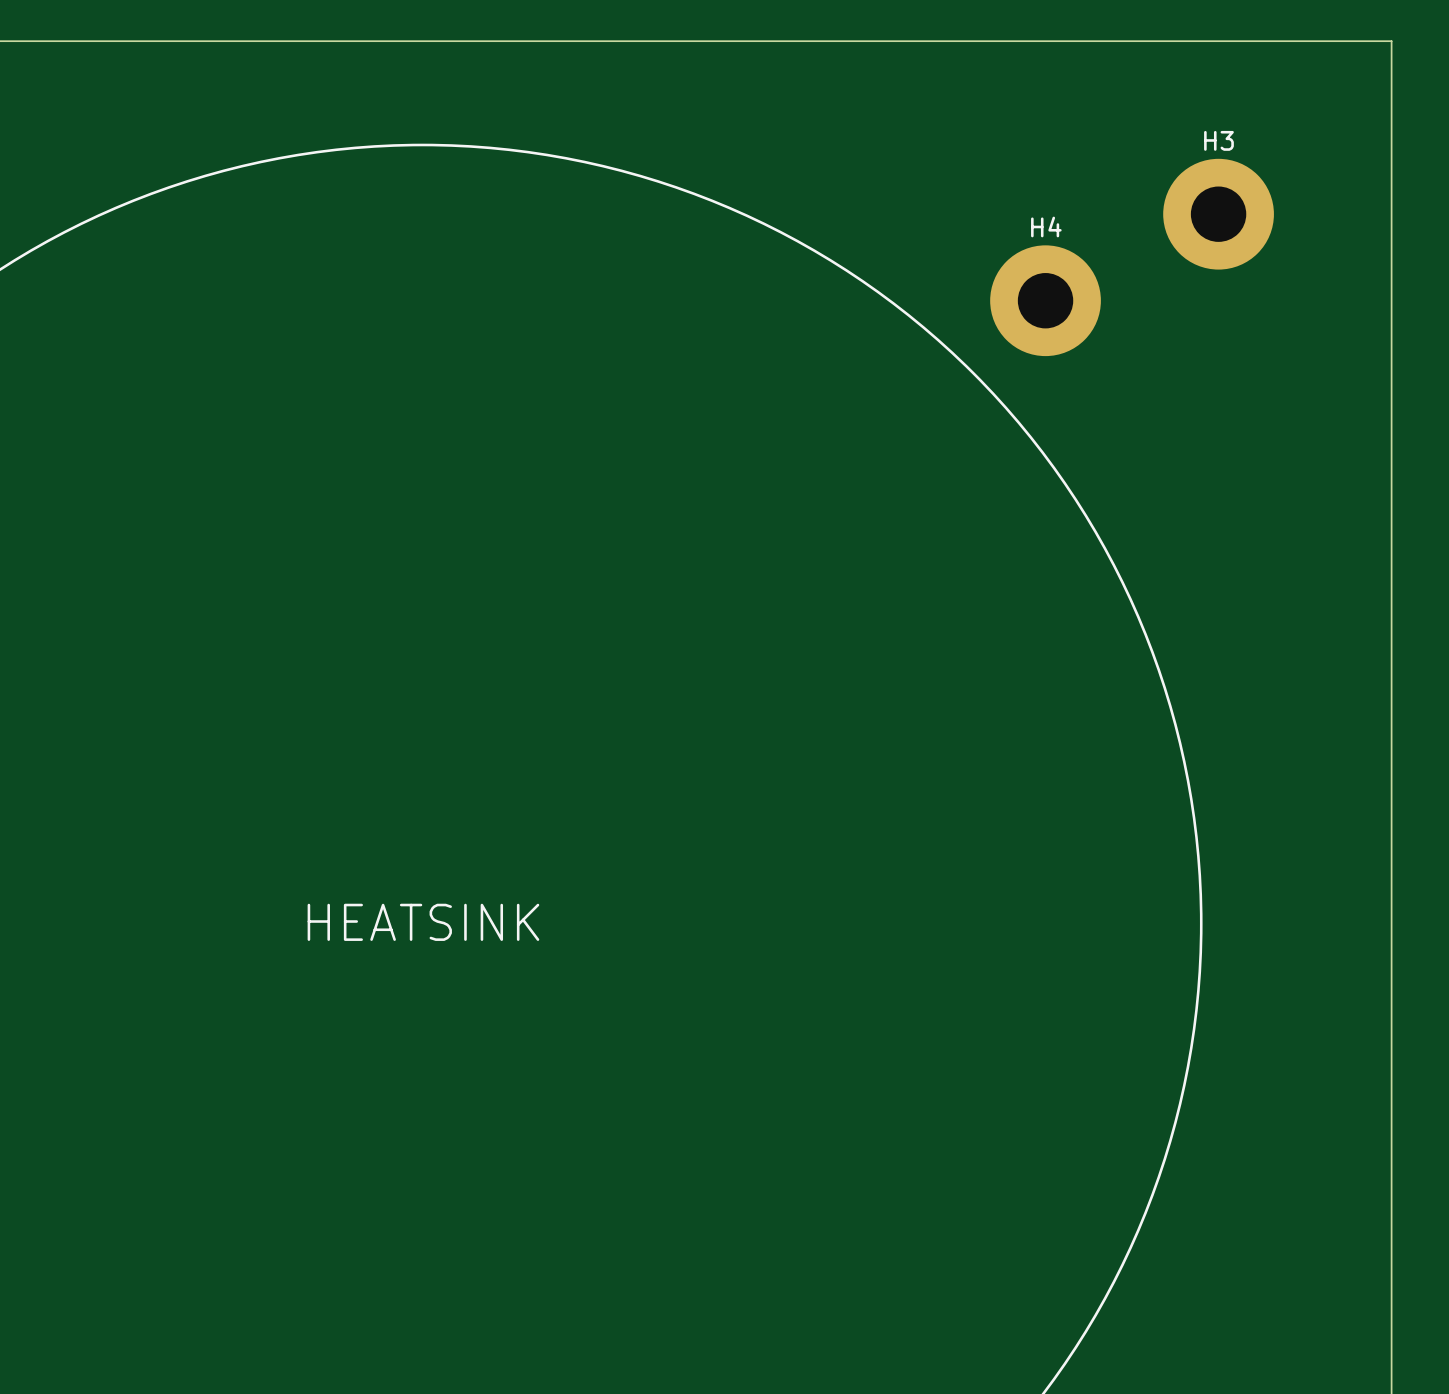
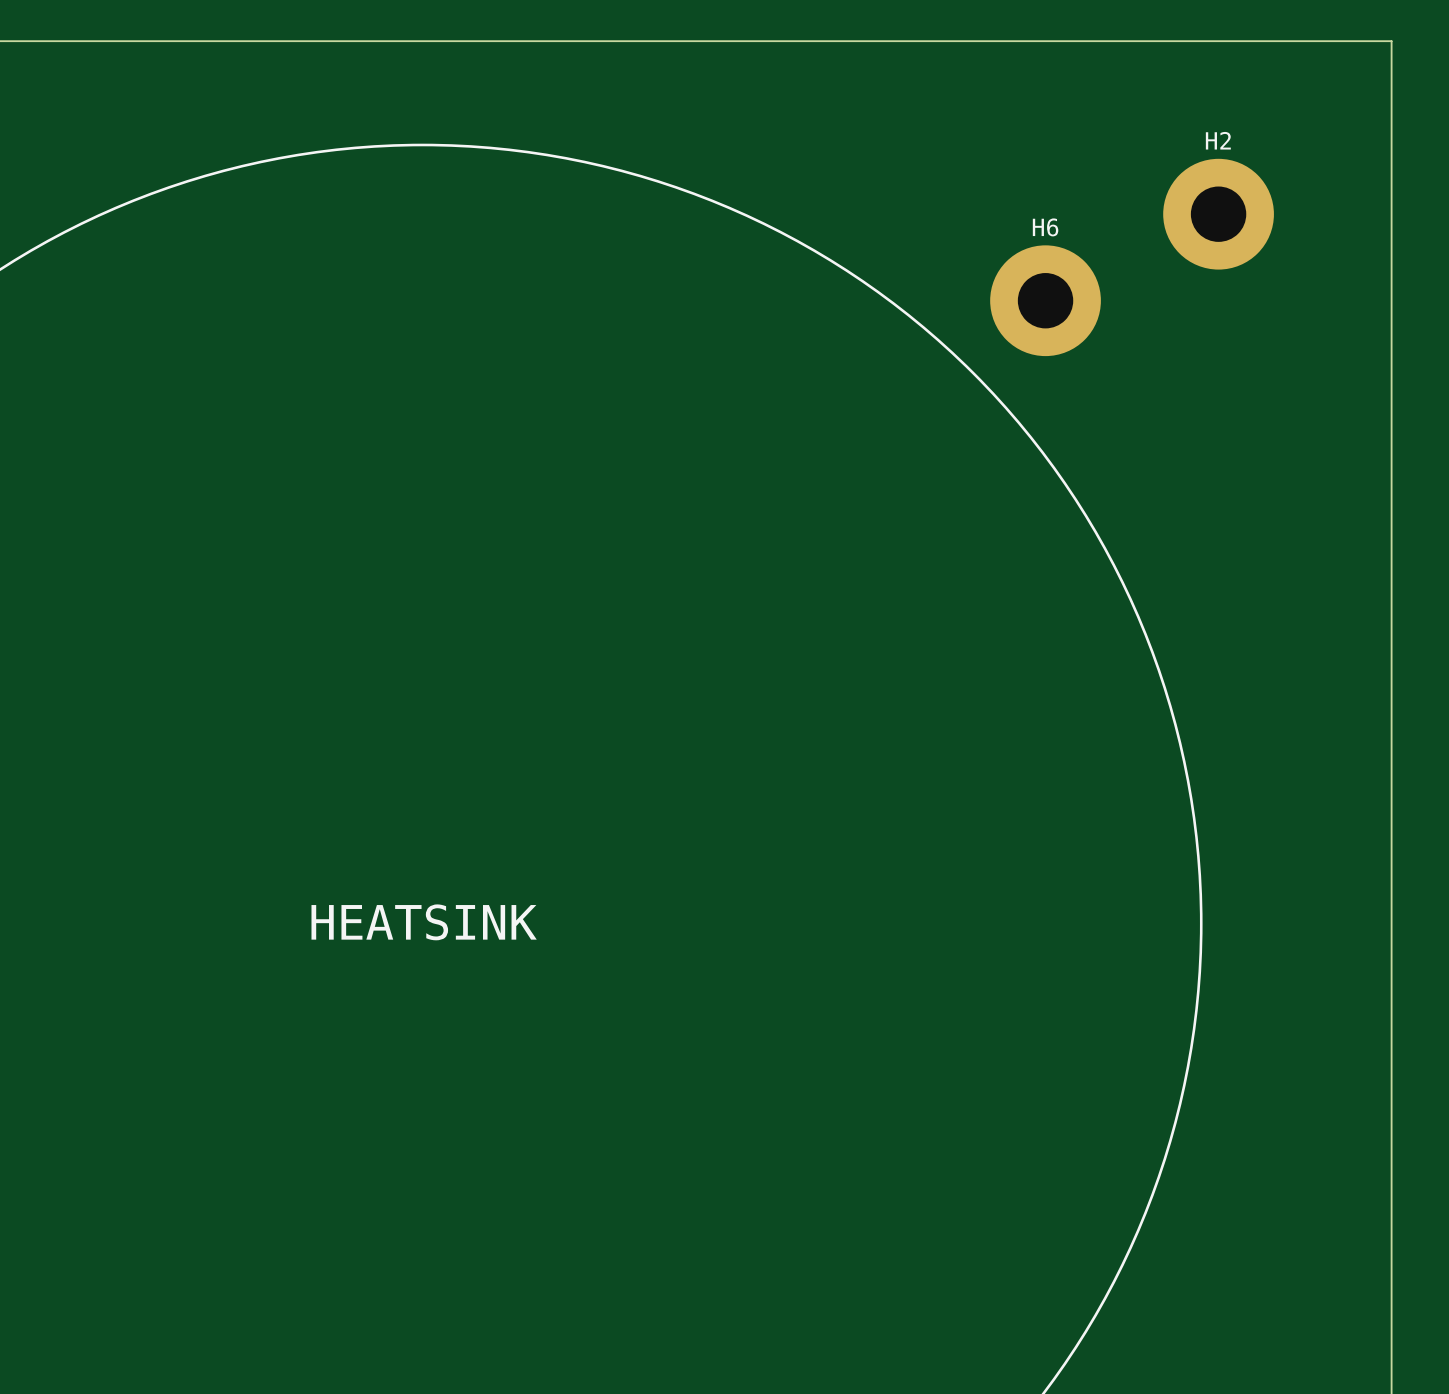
H3 name: H3 (1218, 140) -> H2 (1218, 140)
H4 name: H4 (1046, 226) -> H6 (1045, 227)

